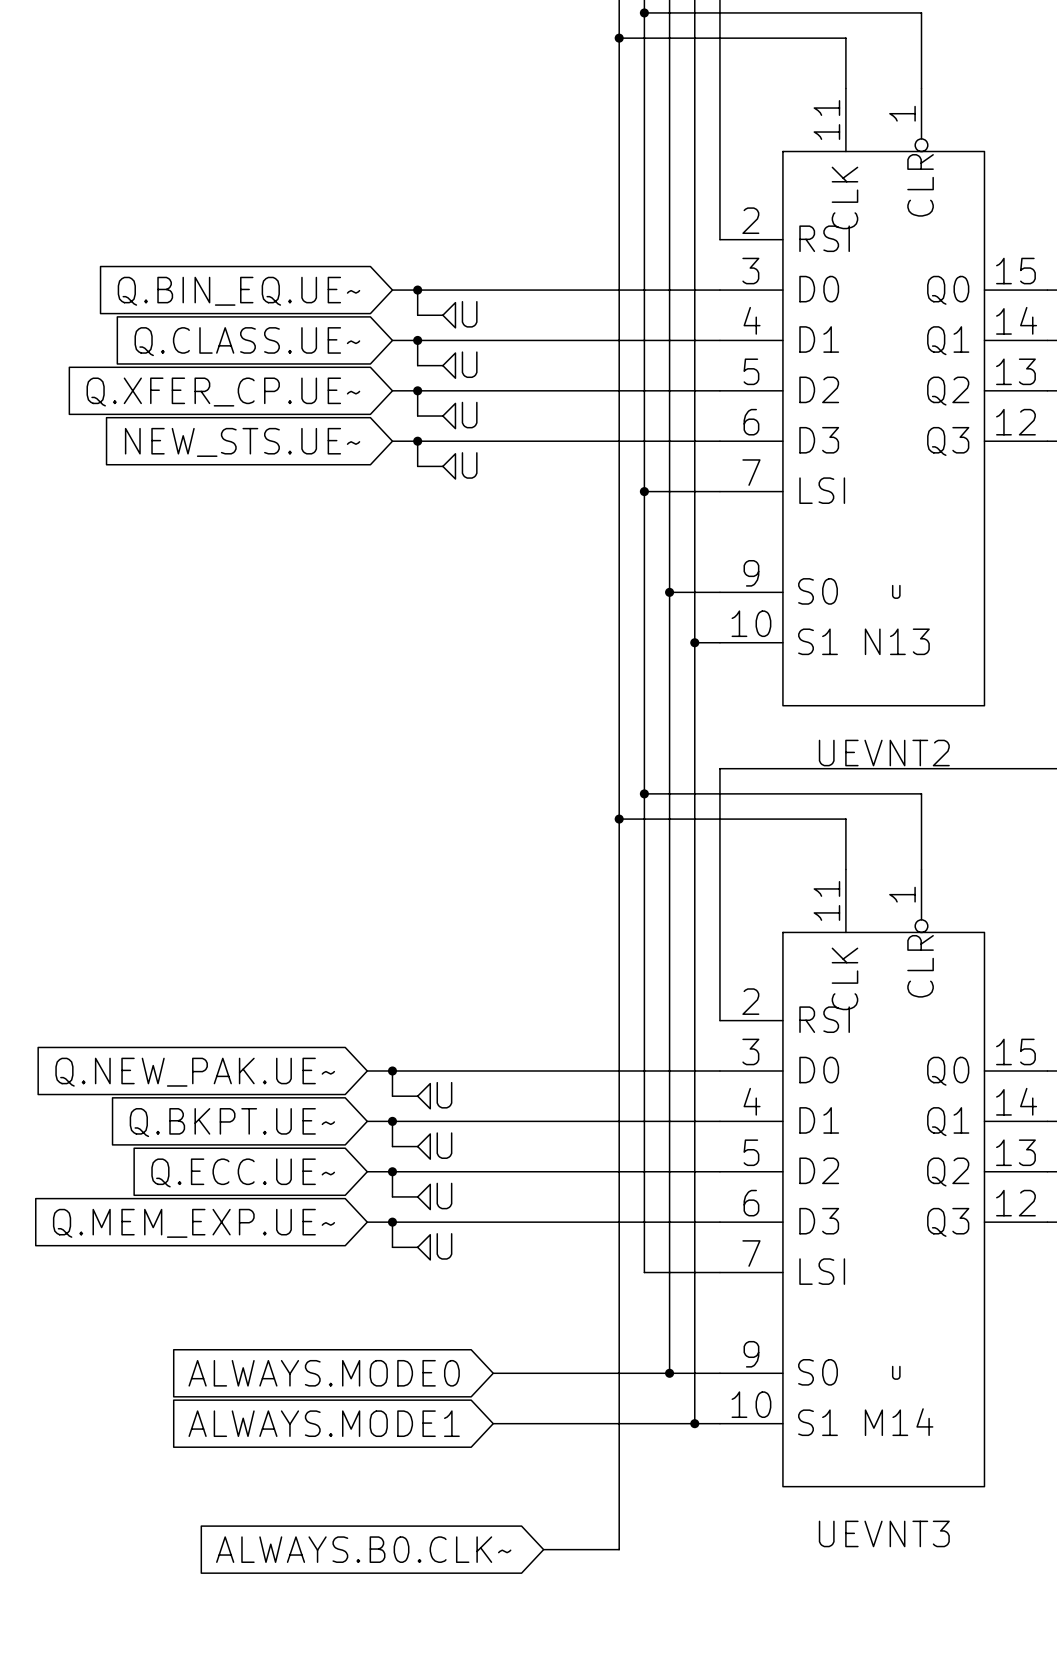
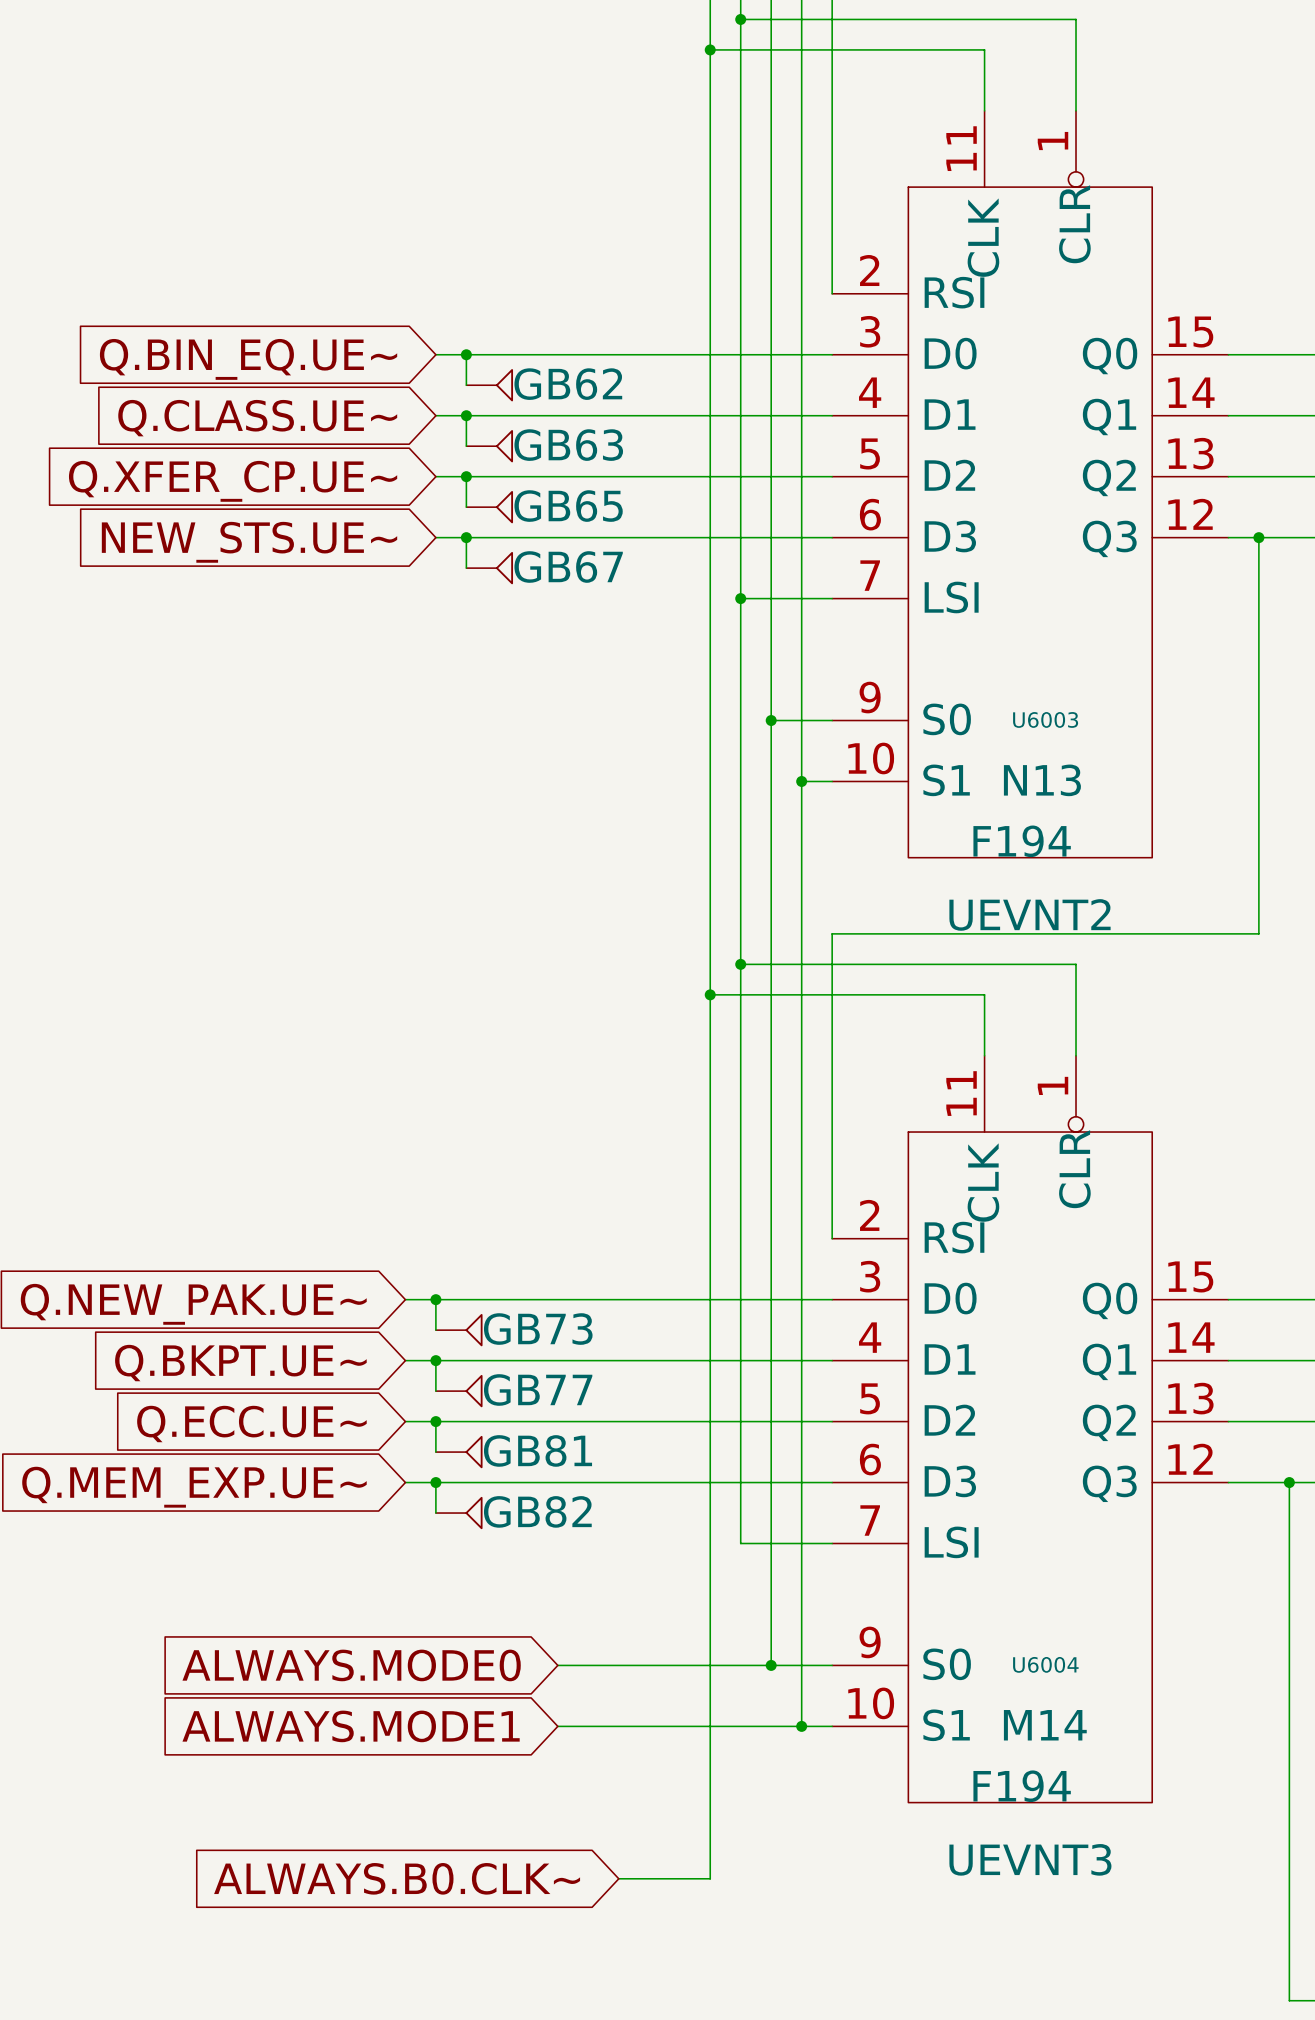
U name: U (469, 314) -> GB62 (568, 384)
U name: U (469, 364) -> GB63 (568, 445)
U name: U (469, 415) -> GB65 (568, 506)
U name: U (469, 465) -> GB67 (568, 567)
U name: U (896, 591) -> U6003 (1045, 719)
U value: none -> F194 (1022, 841)
U name: U (444, 1095) -> GB73 (538, 1329)
U name: U (444, 1145) -> GB77 (538, 1389)
U name: U (444, 1196) -> GB81 (538, 1450)
U name: U (444, 1246) -> GB82 (537, 1511)
U name: U (896, 1372) -> U6004 (1045, 1664)
U value: none -> F194 (1022, 1786)

